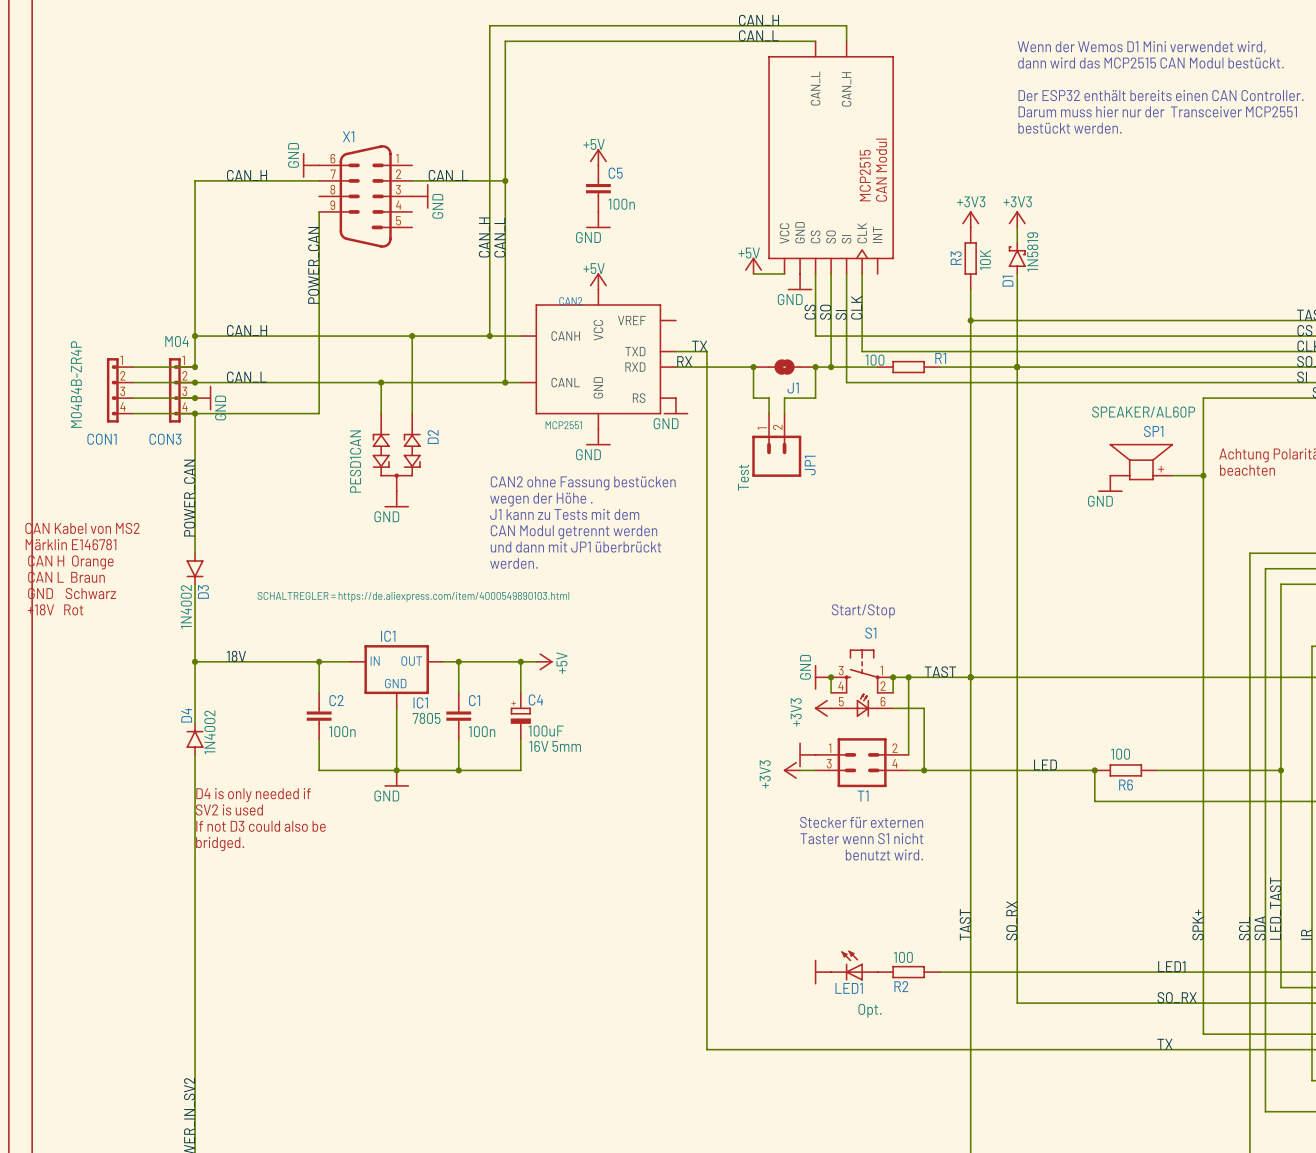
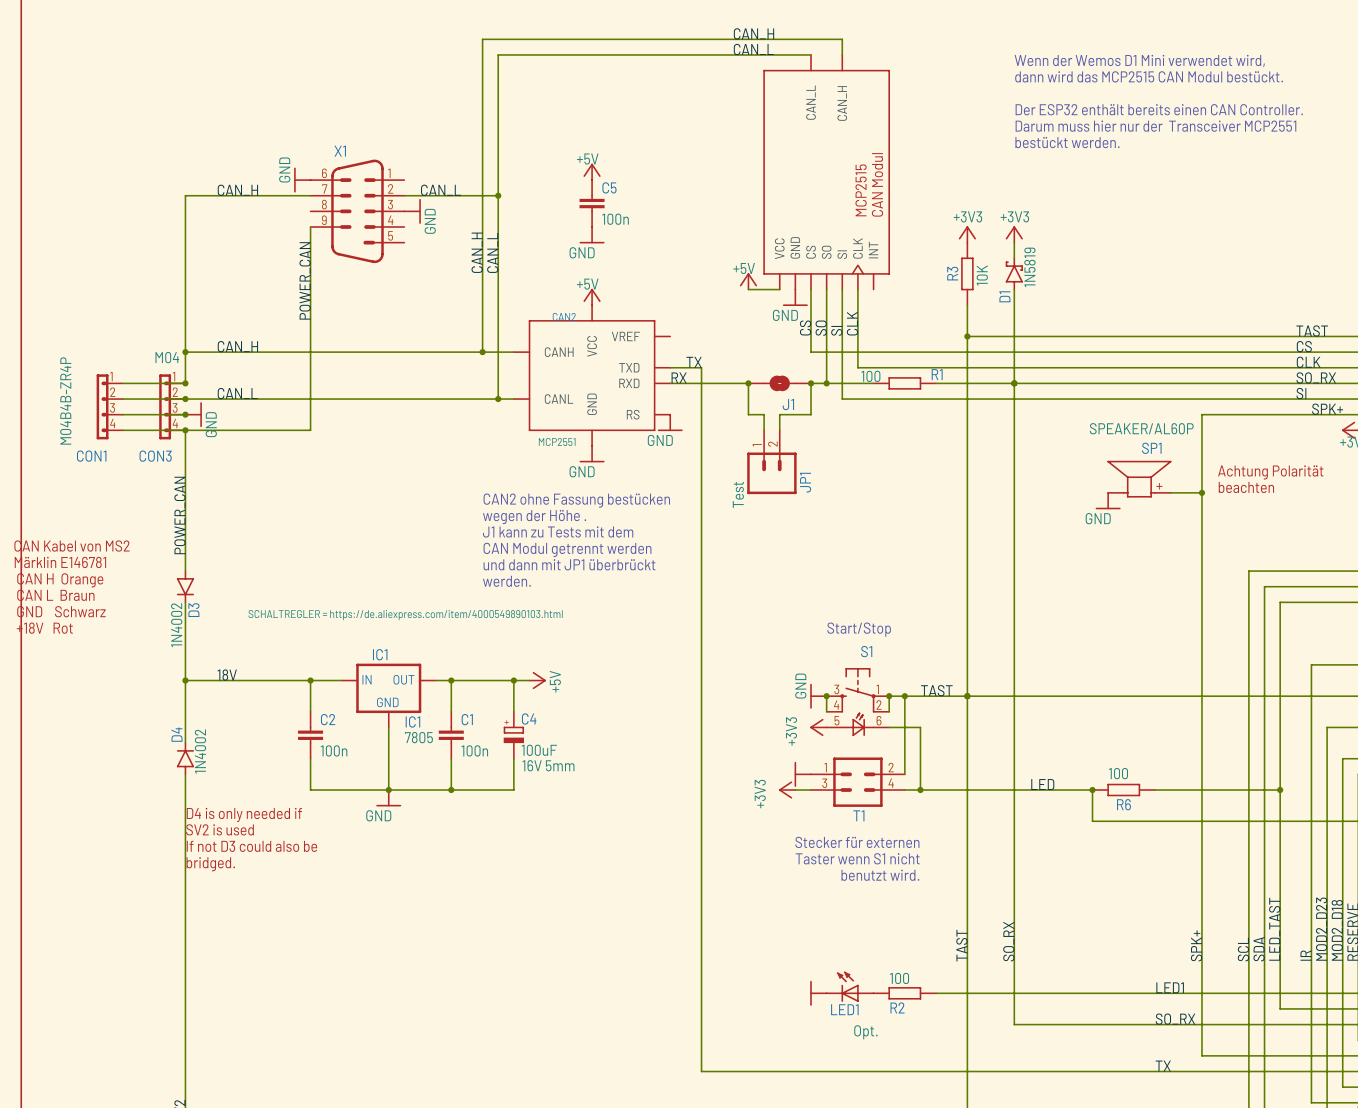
wire: (412, 336) (412, 413) -> none
junction: (412, 336) -> none
wire: (381, 382) (381, 413) -> none
junction: (381, 382) -> none
D2: PESD1CAN (396, 452) -> none
power symbol: GND (396, 499) -> none

